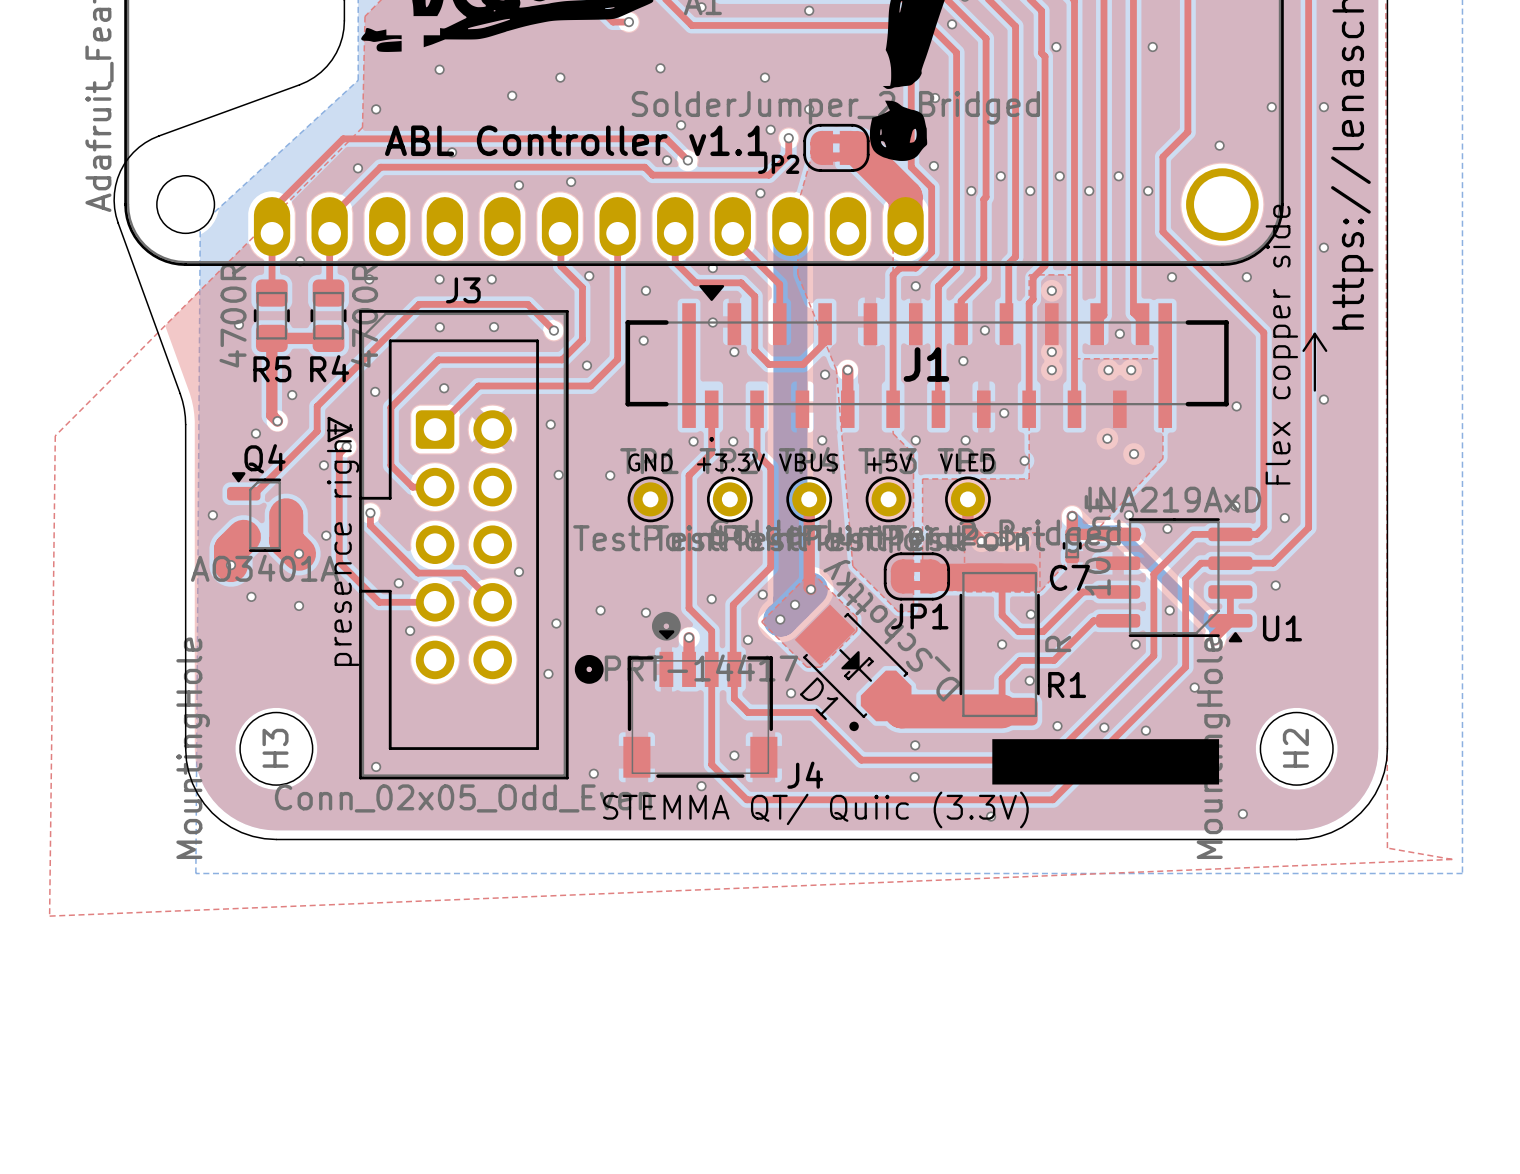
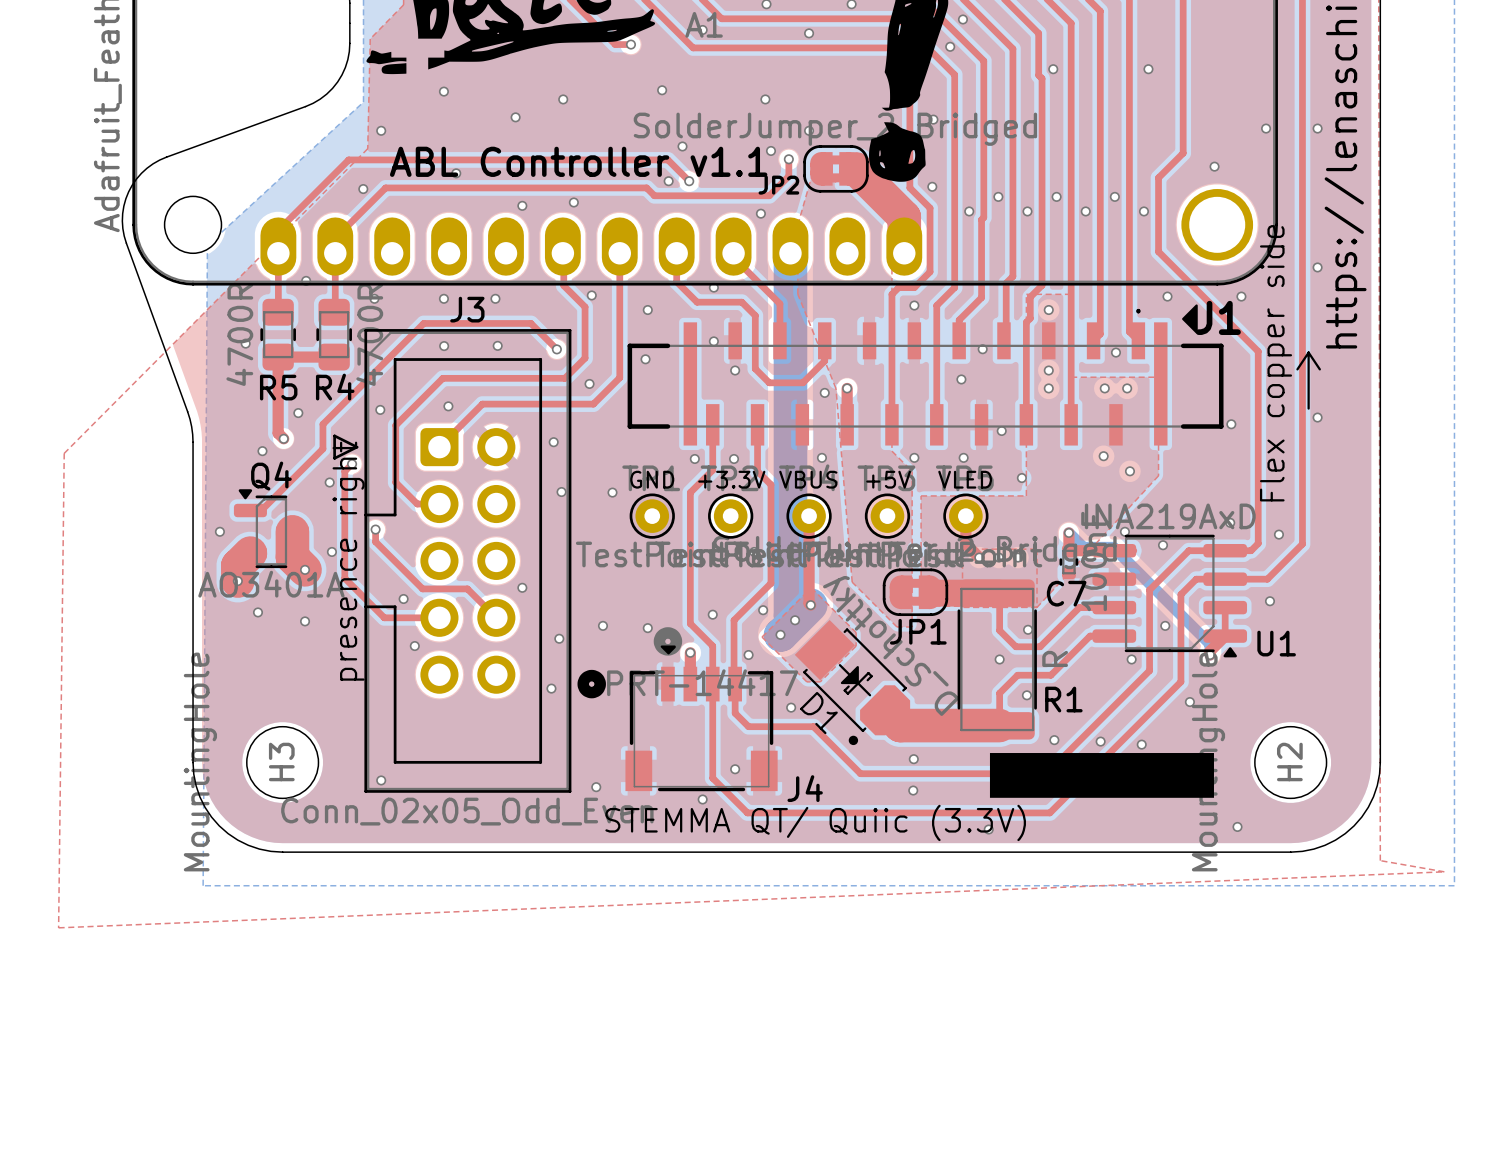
J1 footprint: [625, 285, 1229, 442] -> [627, 308, 1224, 446]
drawing: none -> [1182, 304, 1198, 334]
J1 name position: J1 (926, 364) -> J1 (1218, 317)

